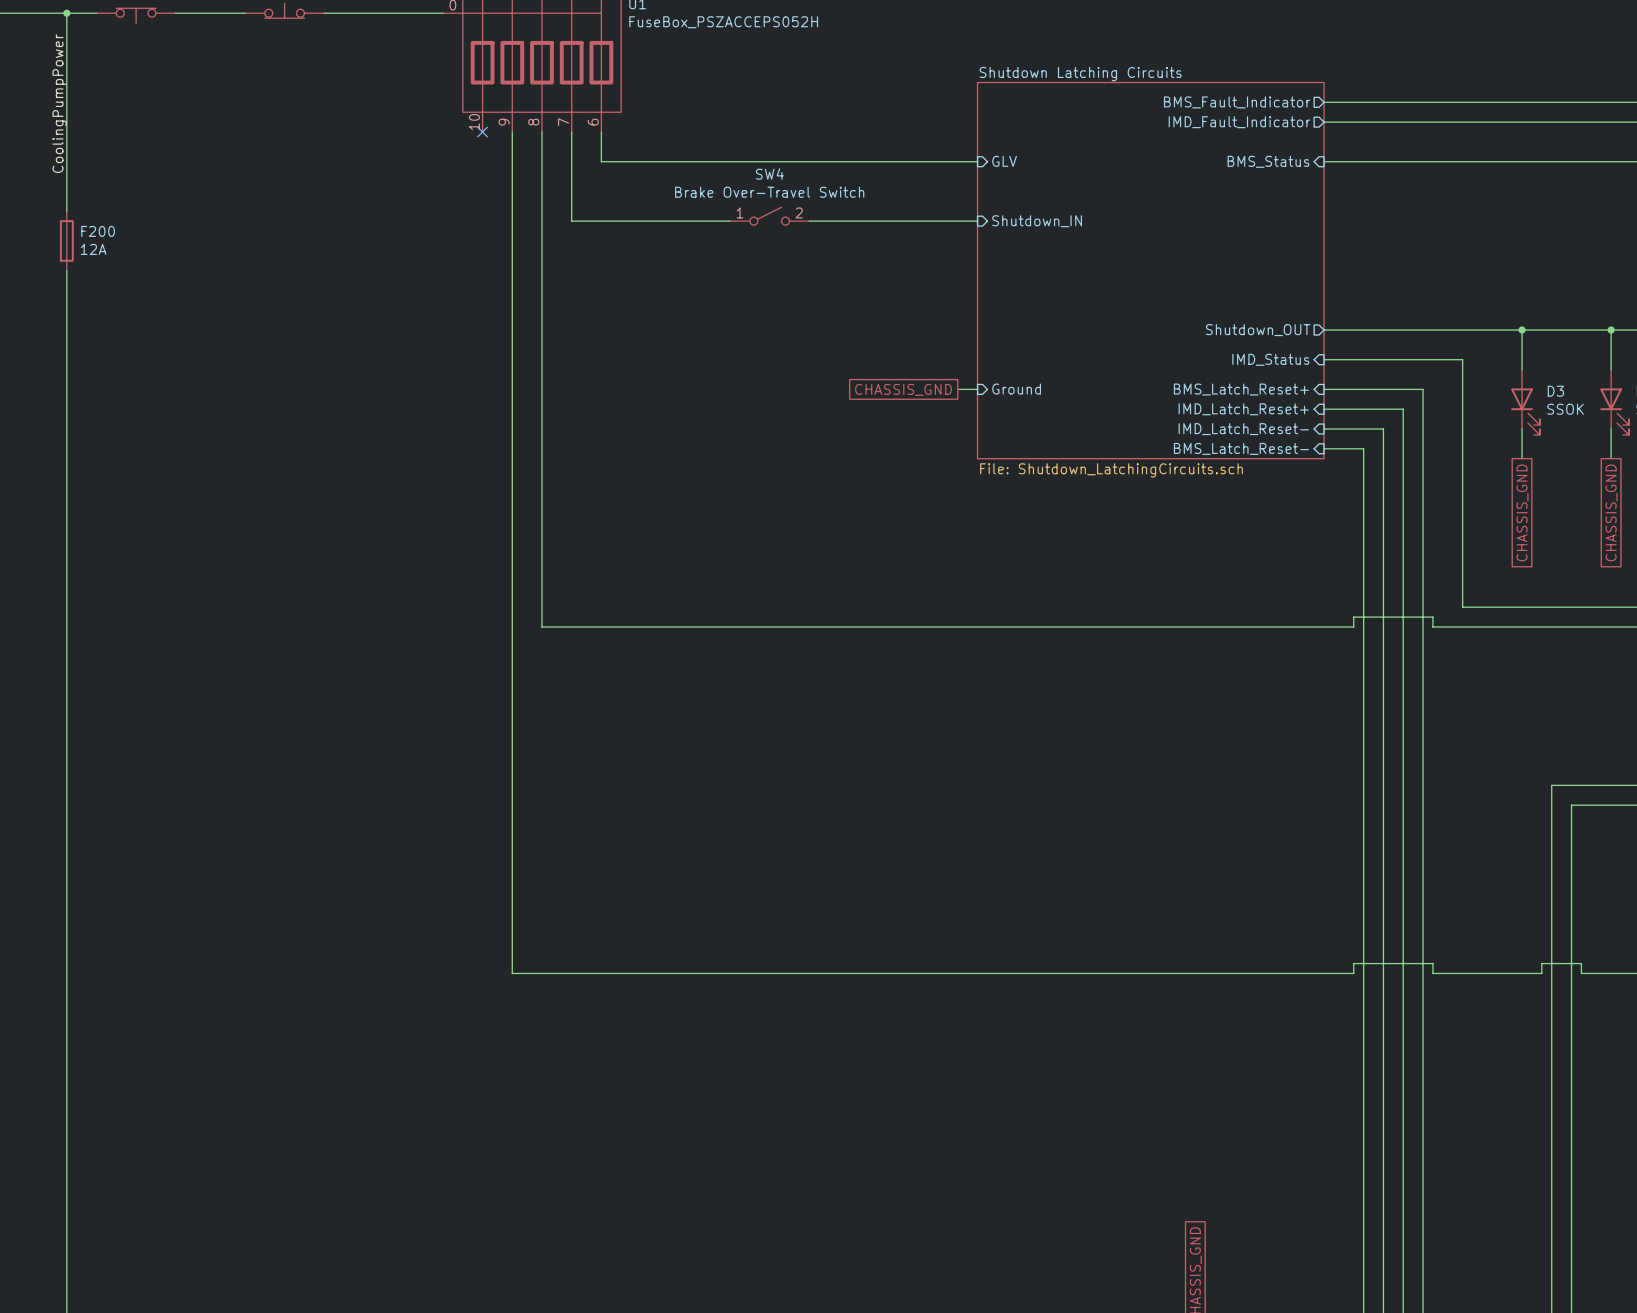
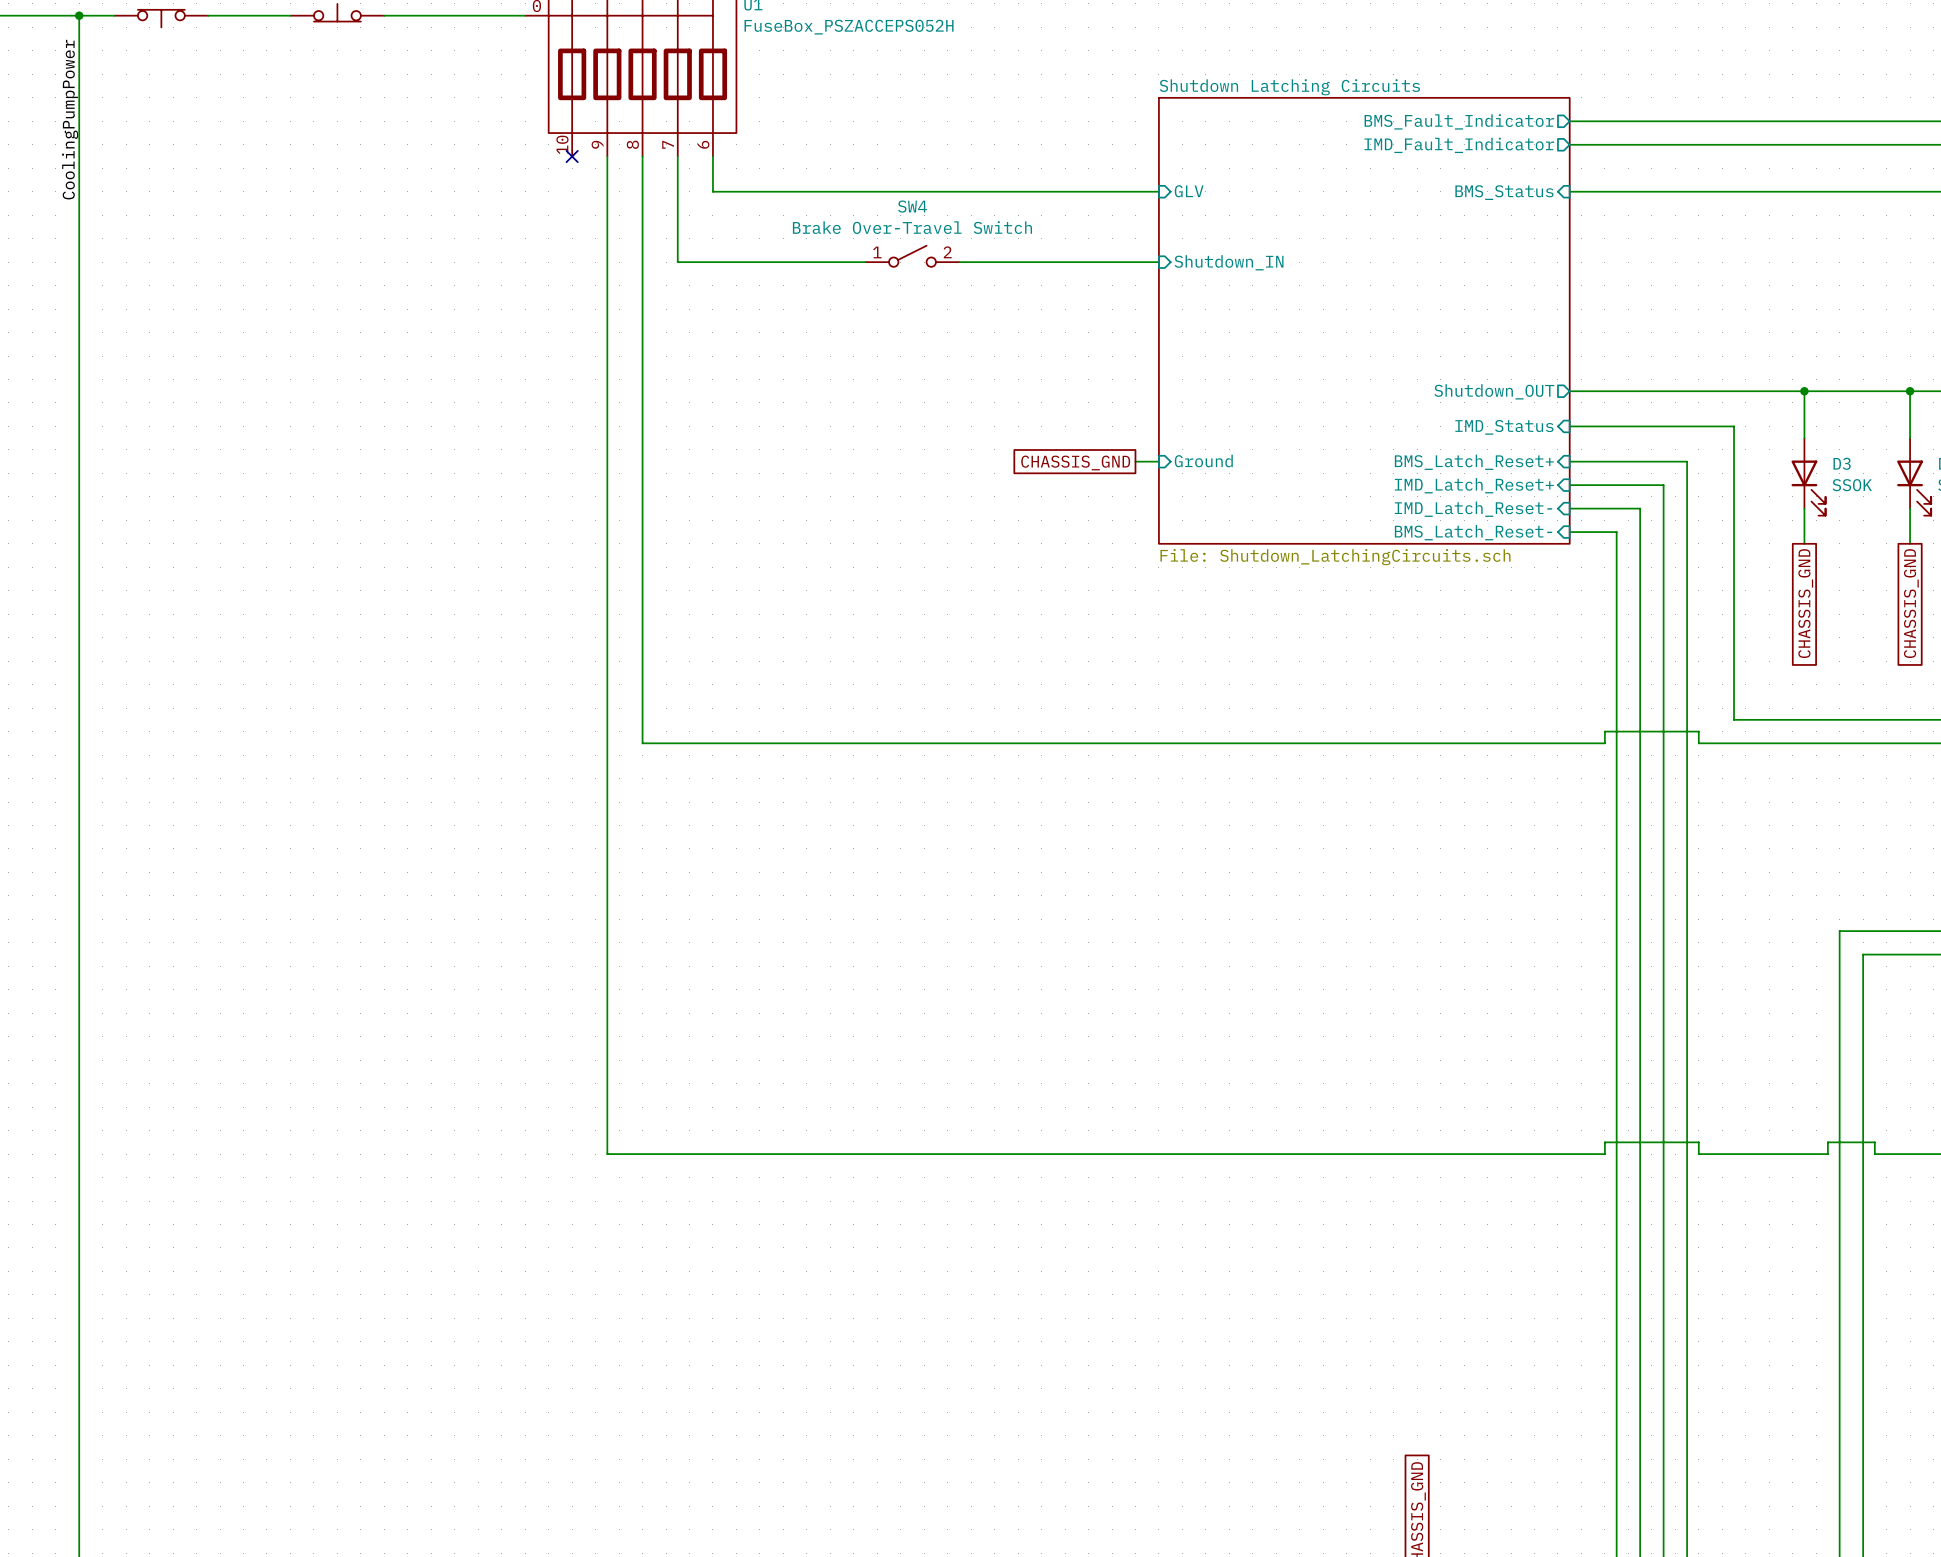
F200: 12A (66, 240) -> none

